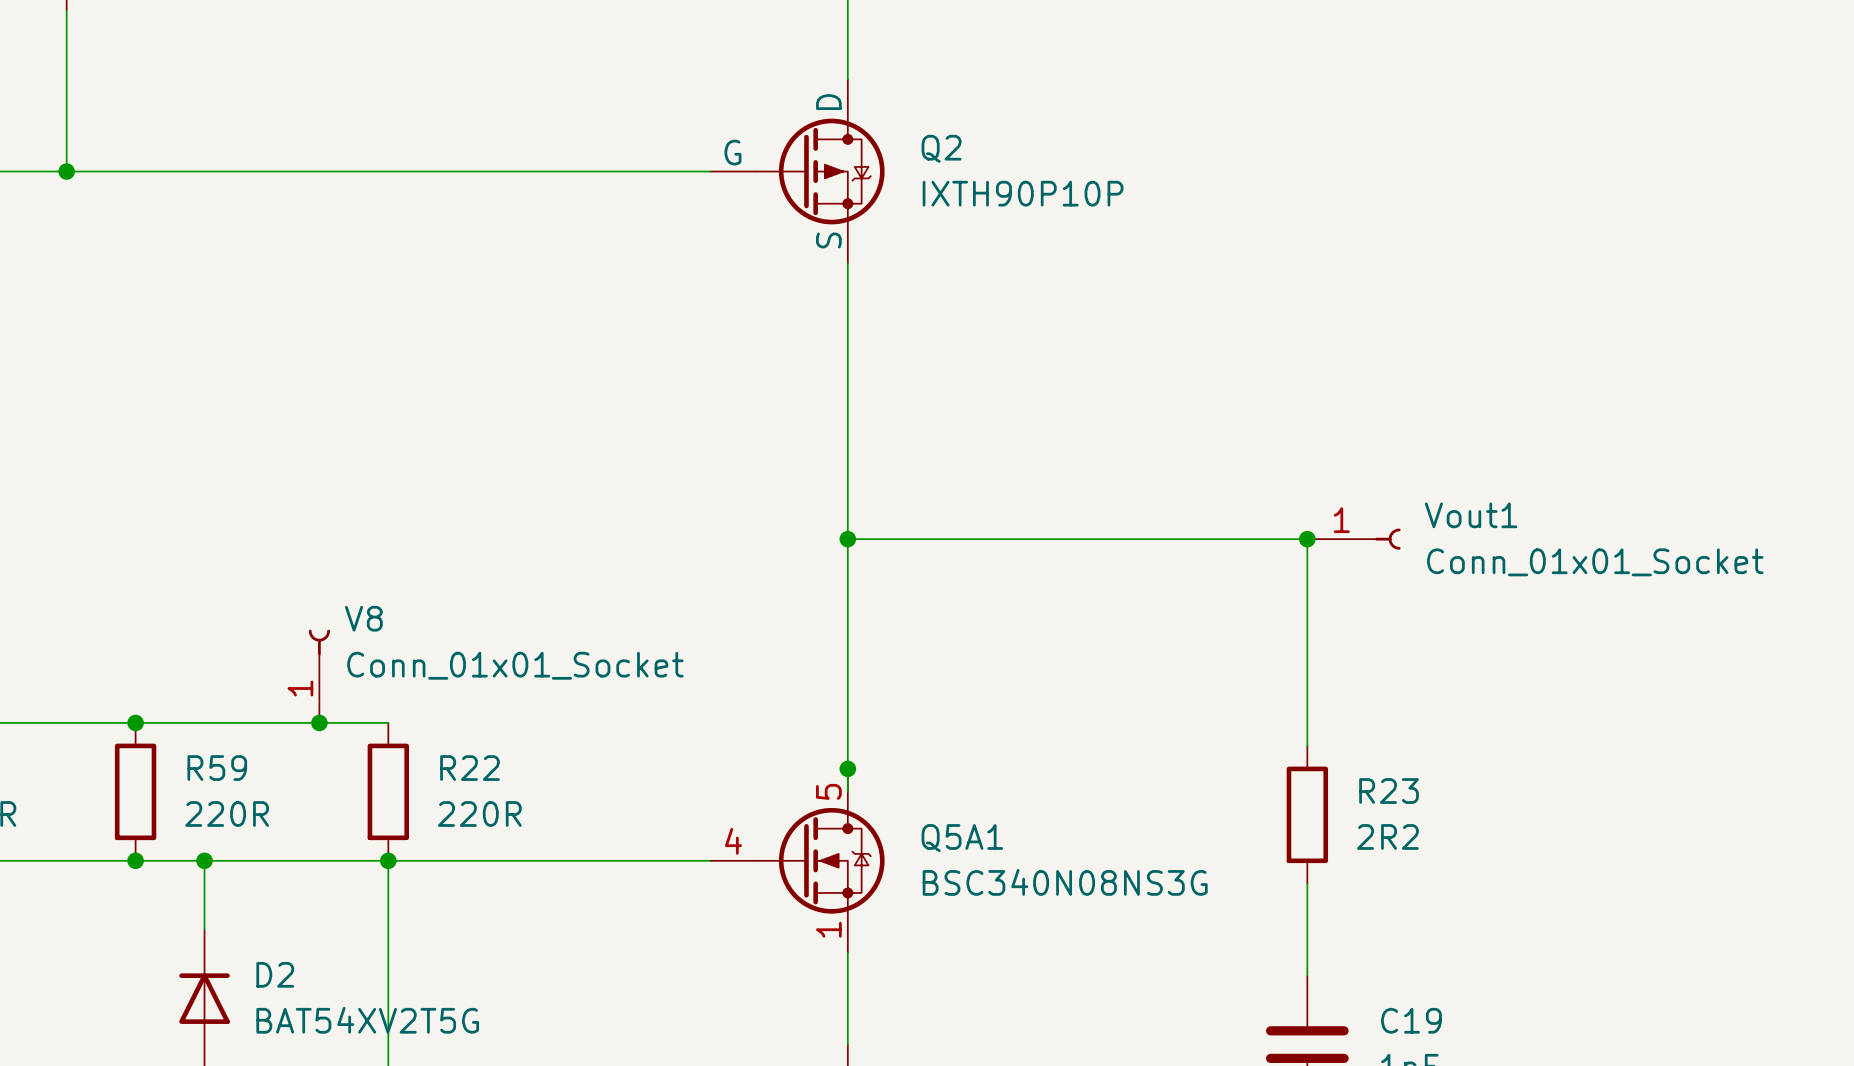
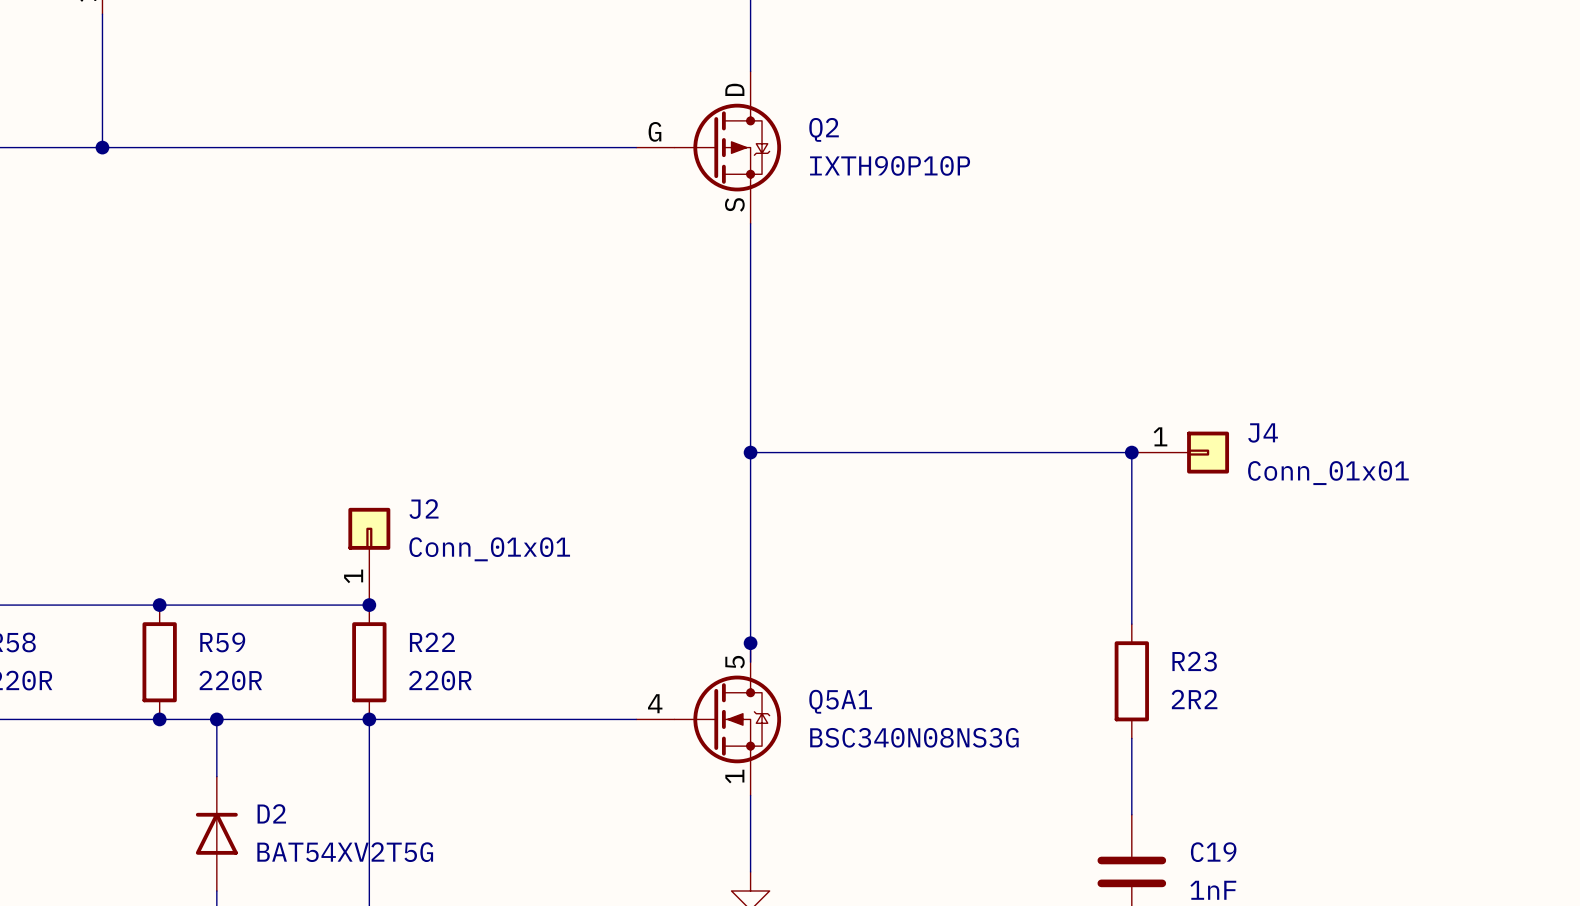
Vout1: Conn_01x01_Socket (1353, 539) -> none
J4: none -> Conn_01x01 (1180, 452)
J2: none -> Conn_01x01 (369, 556)
V8: Conn_01x01_Socket (319, 676) -> none
junction position: (319, 722) -> (369, 605)

